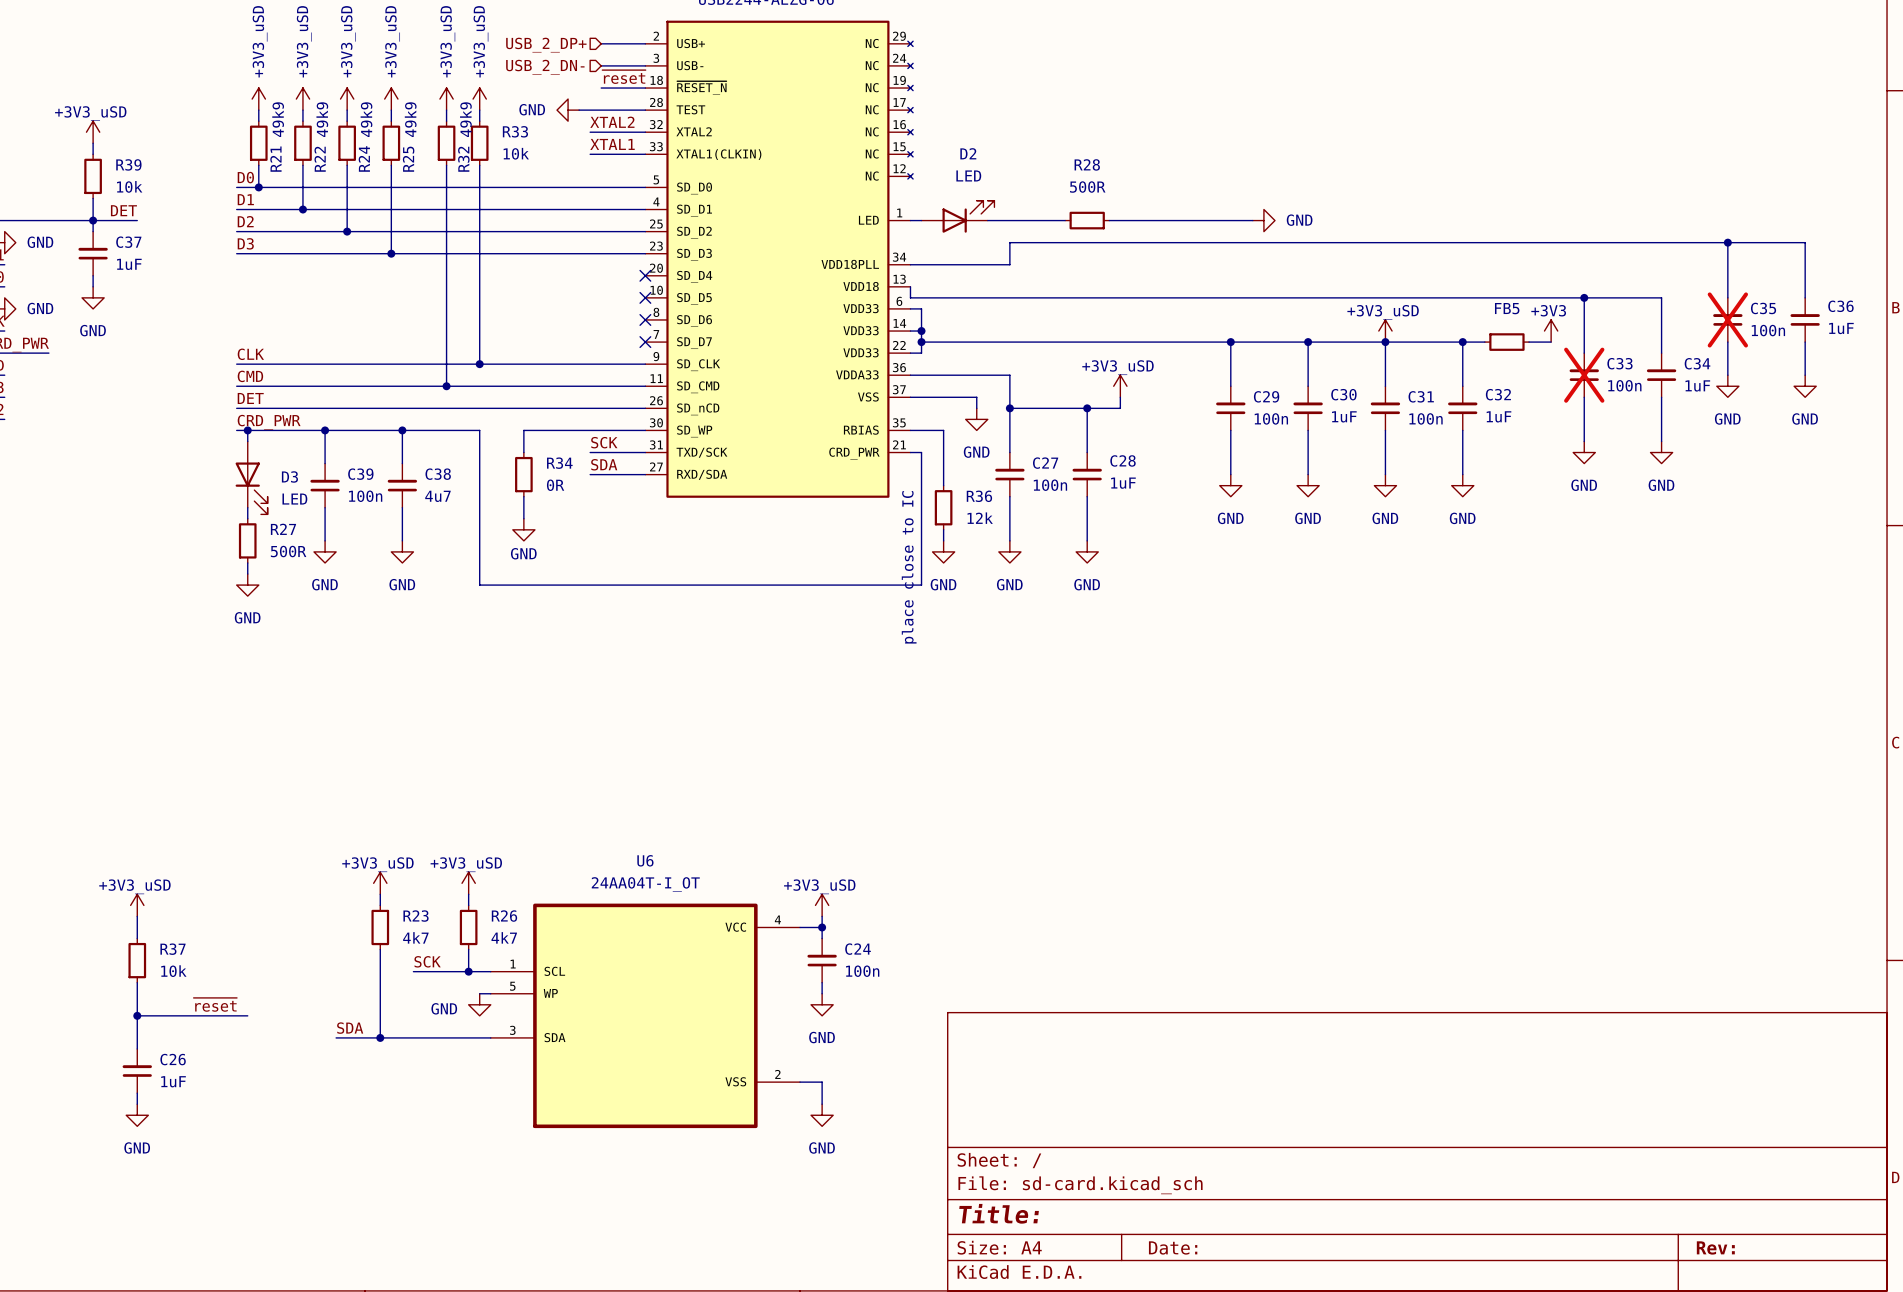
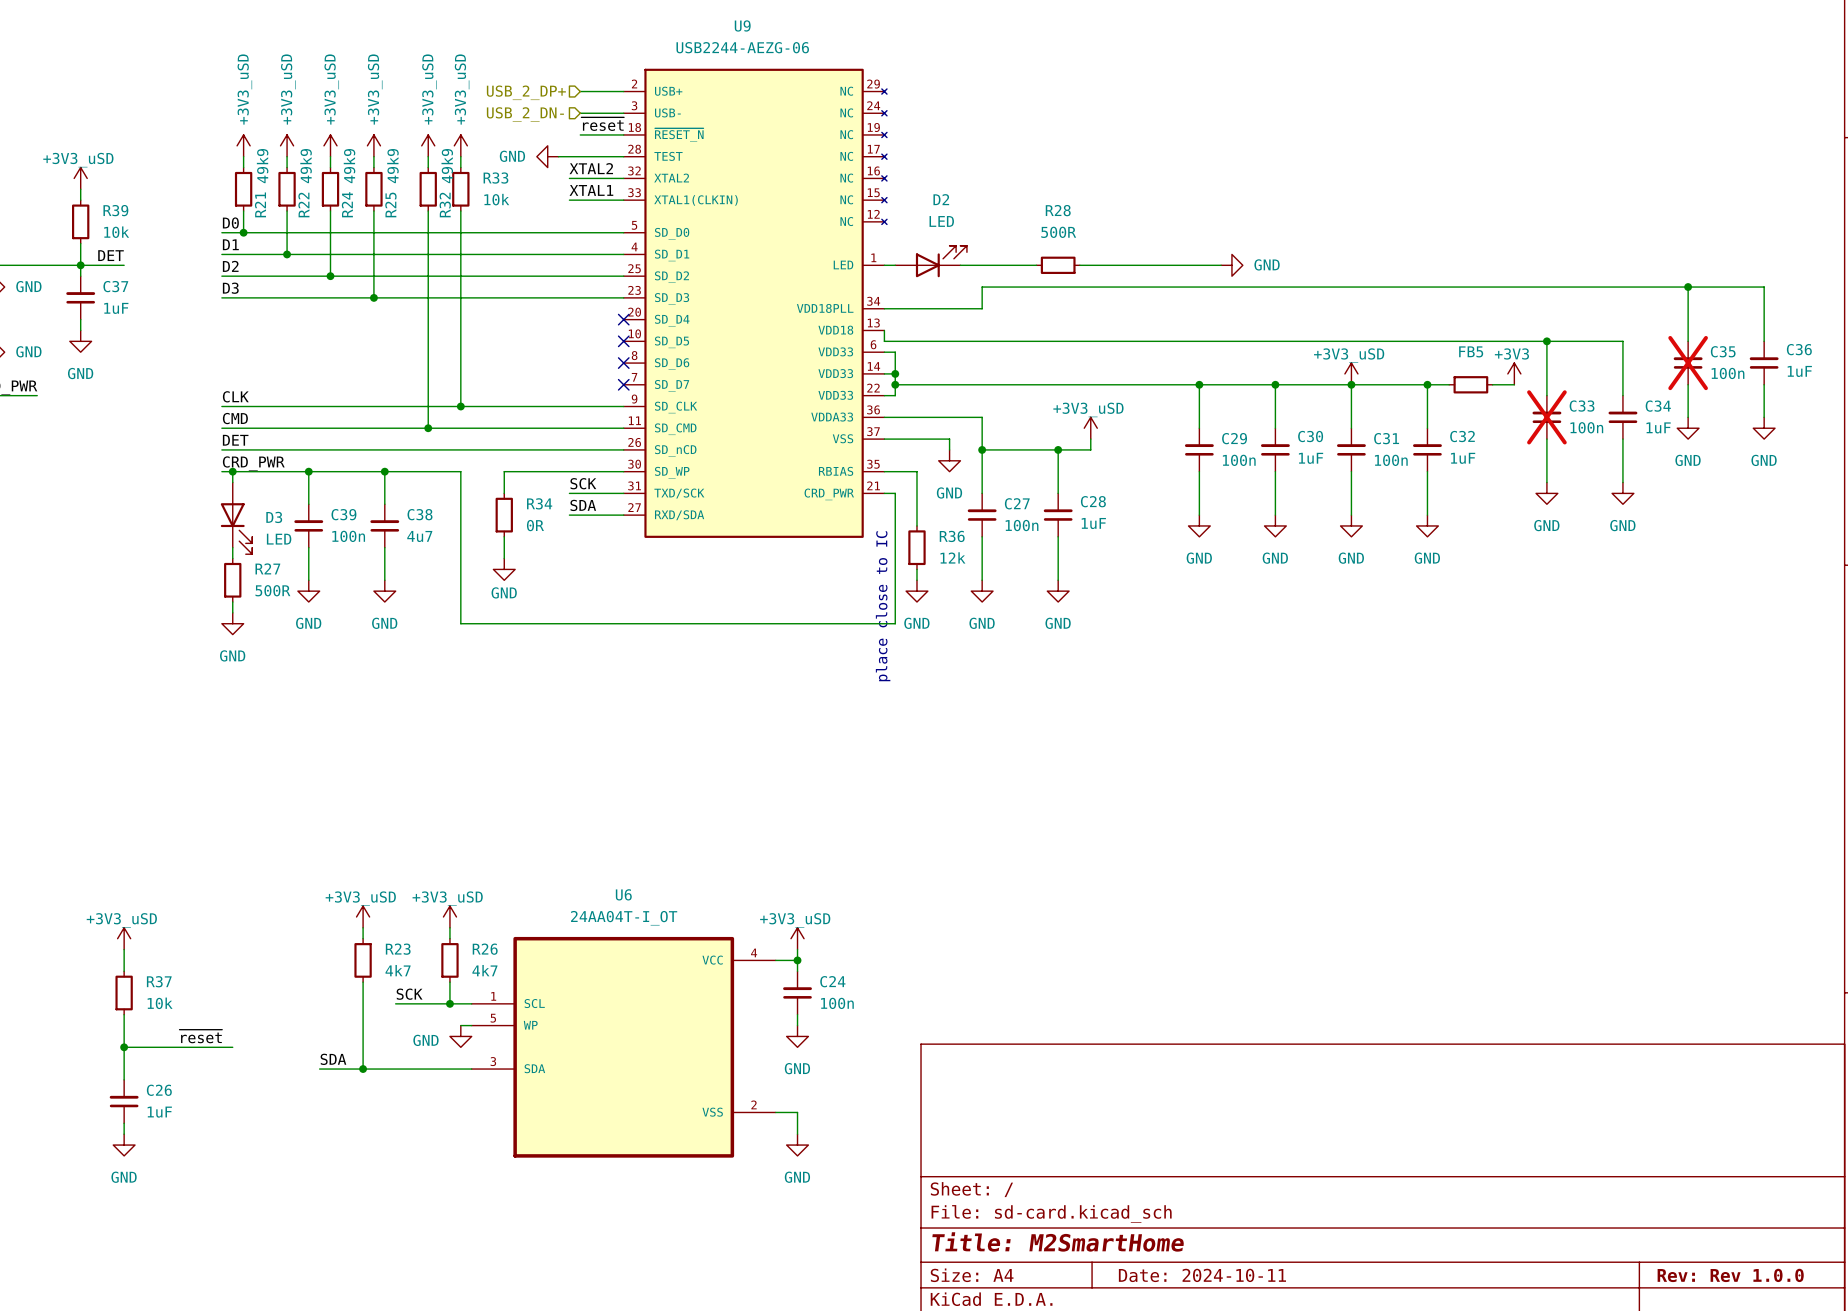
title block: Title: (999, 1213) -> Title: M2SmartHome (1058, 1241)
title block: Date: (1173, 1247) -> Date: 2024-10-11 (1202, 1275)
title block: Rev: (1715, 1247) -> Rev: Rev 1.0.0 (1730, 1275)

